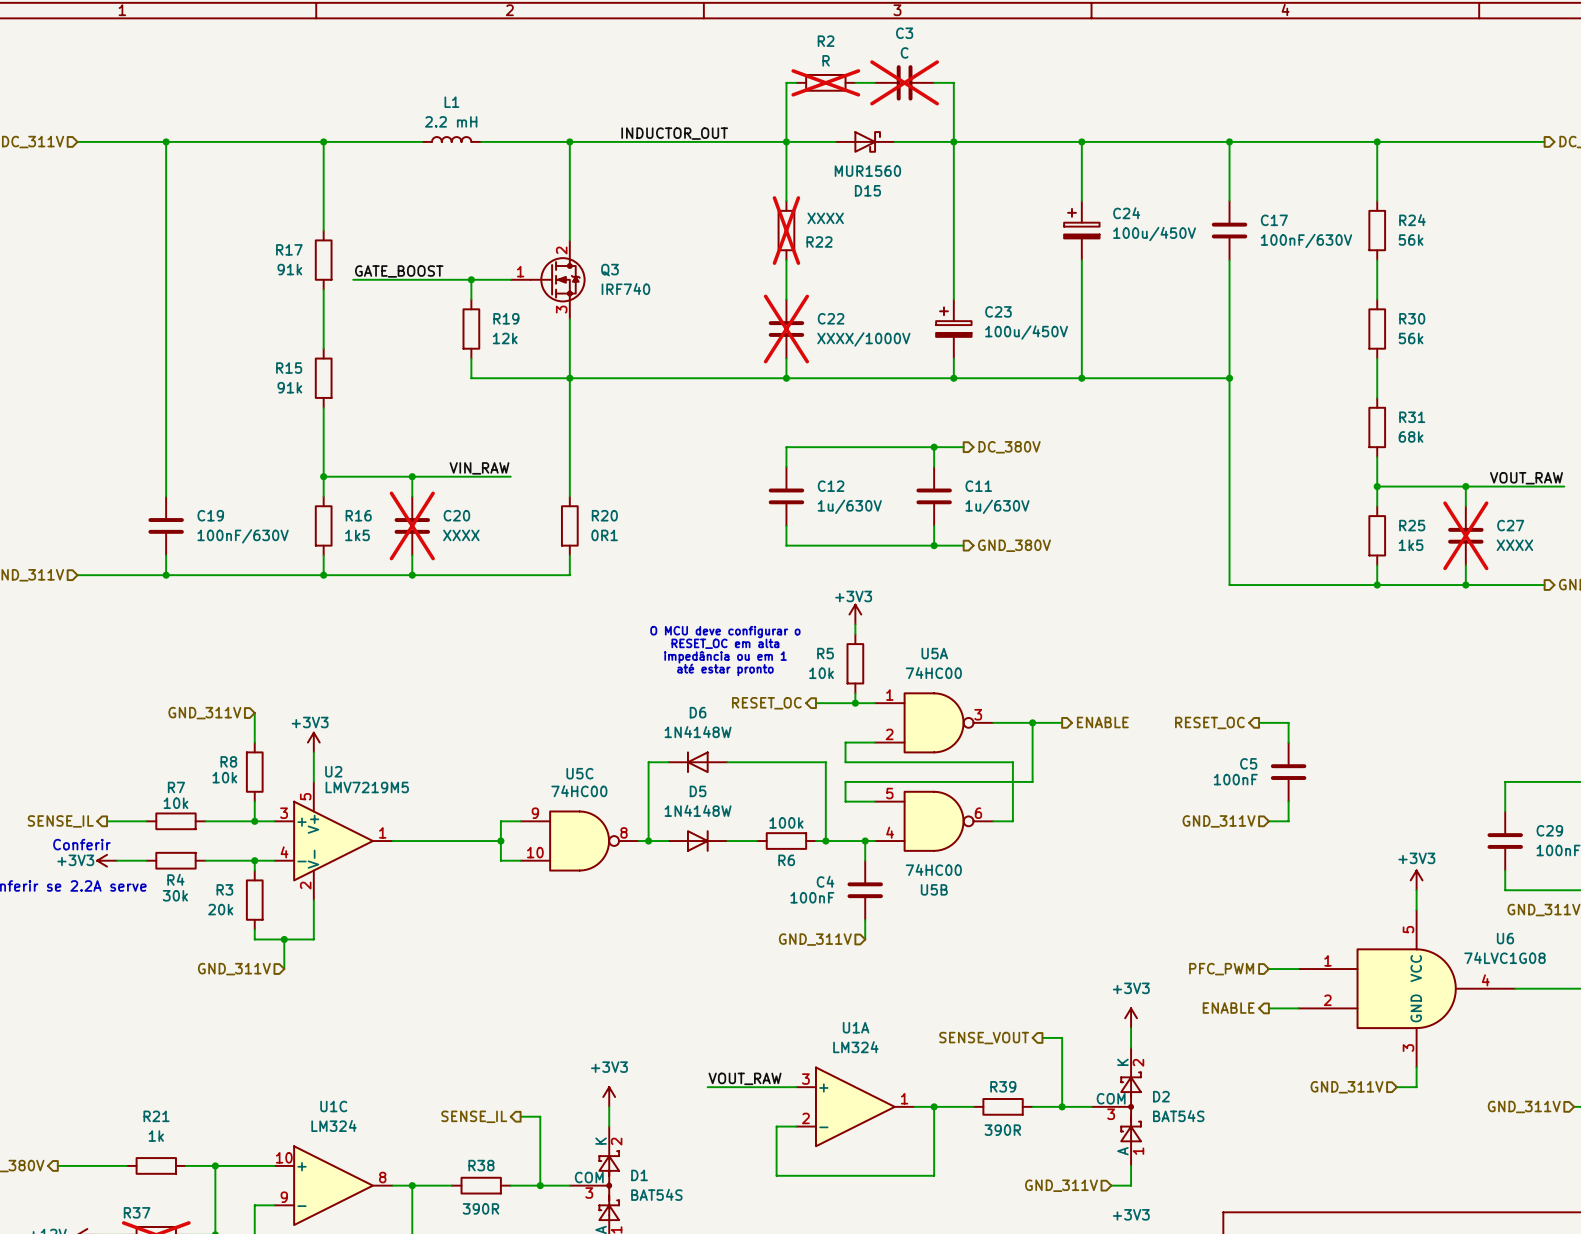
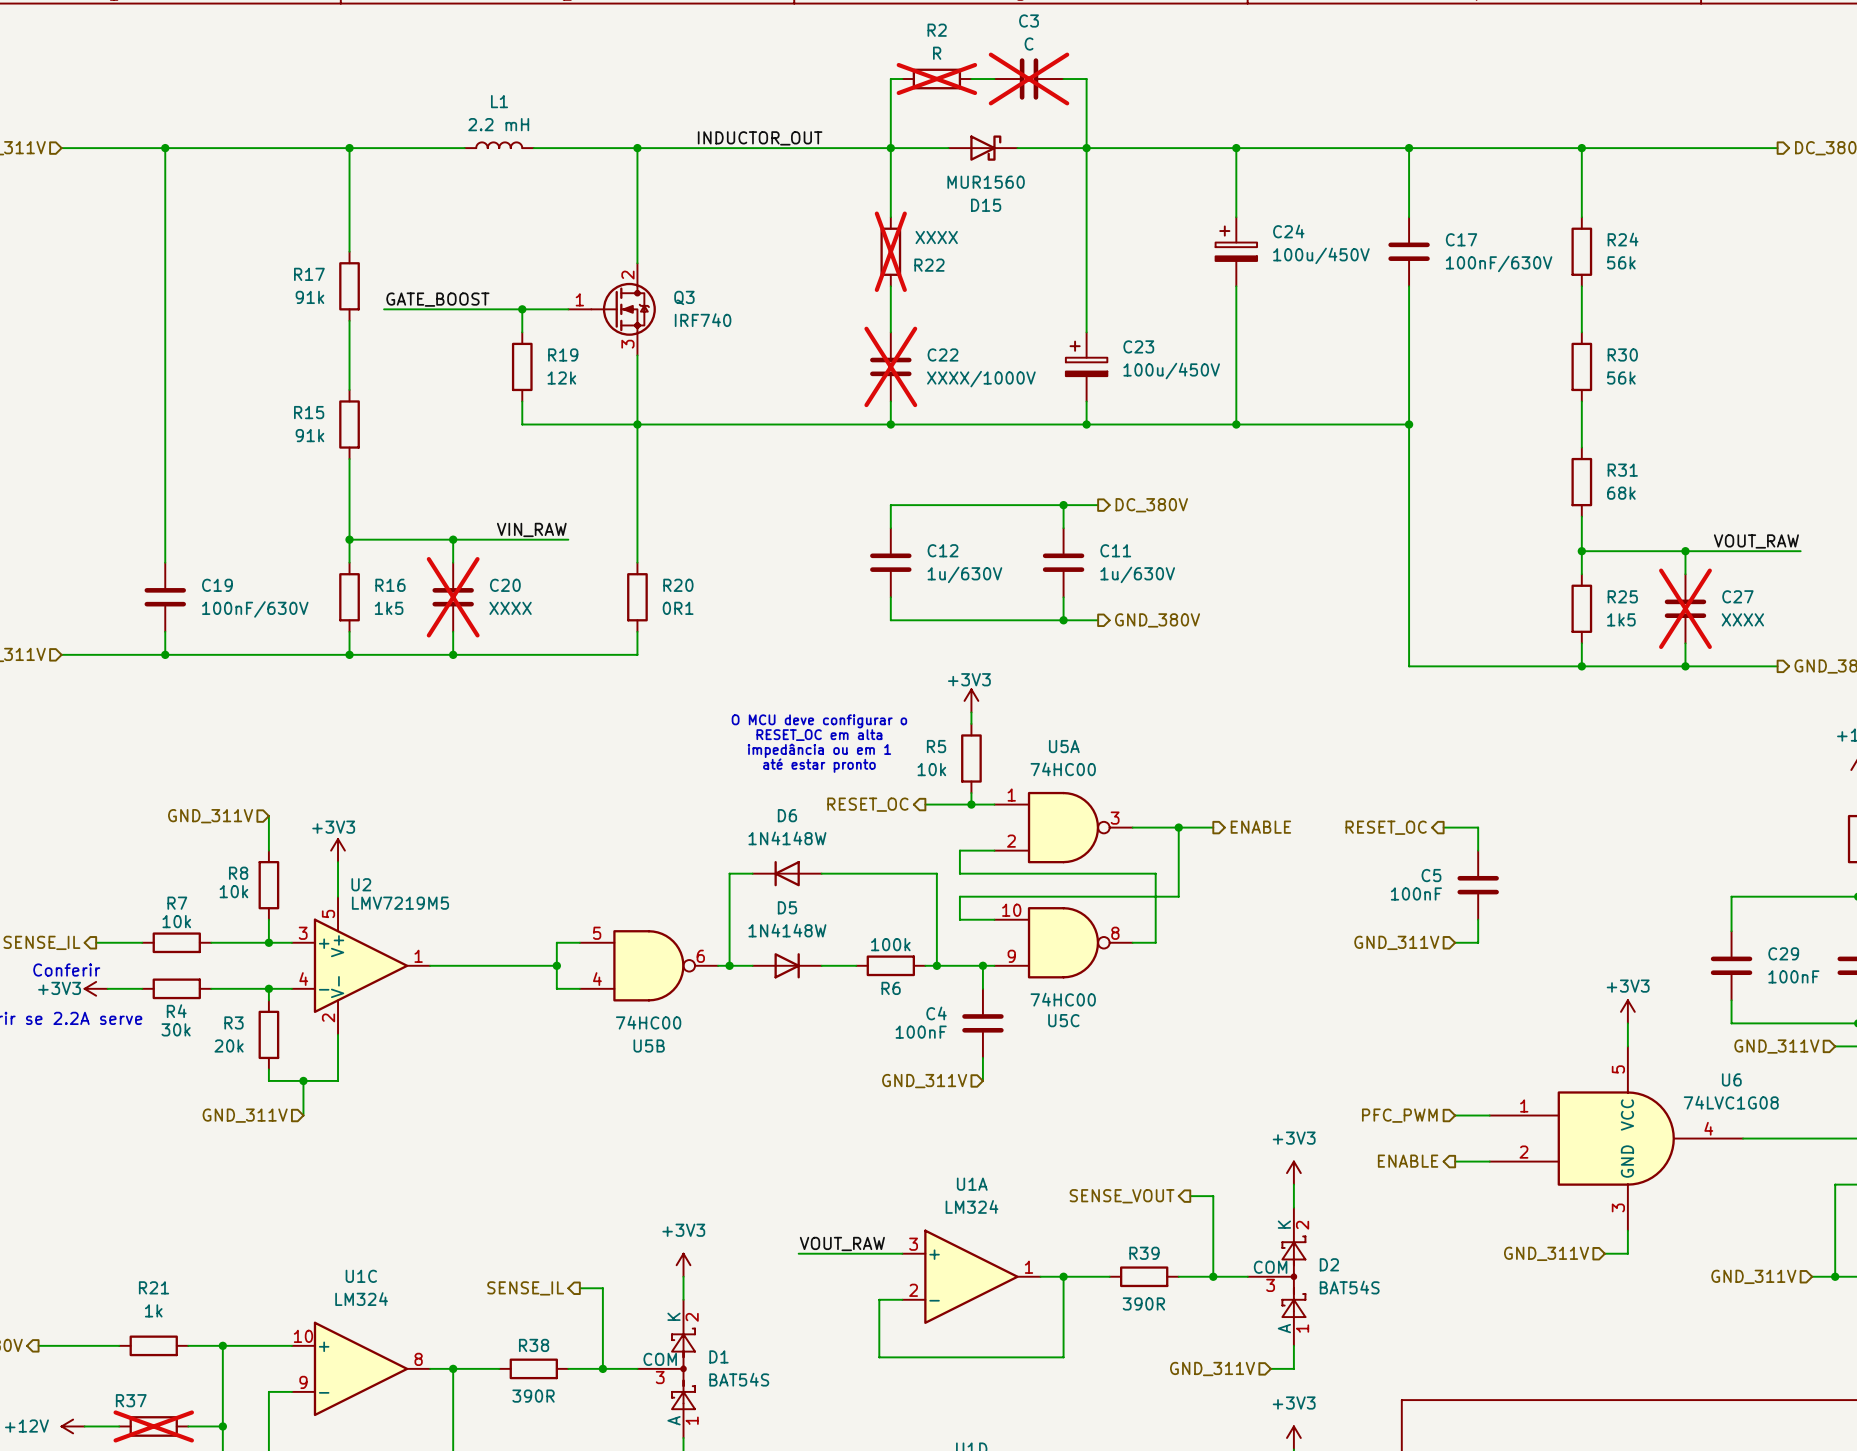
U5B position: (934, 821) -> (648, 965)
U5C flip: as is (579, 841) -> up-down (1063, 942)
U5C position: (579, 841) -> (1063, 942)

